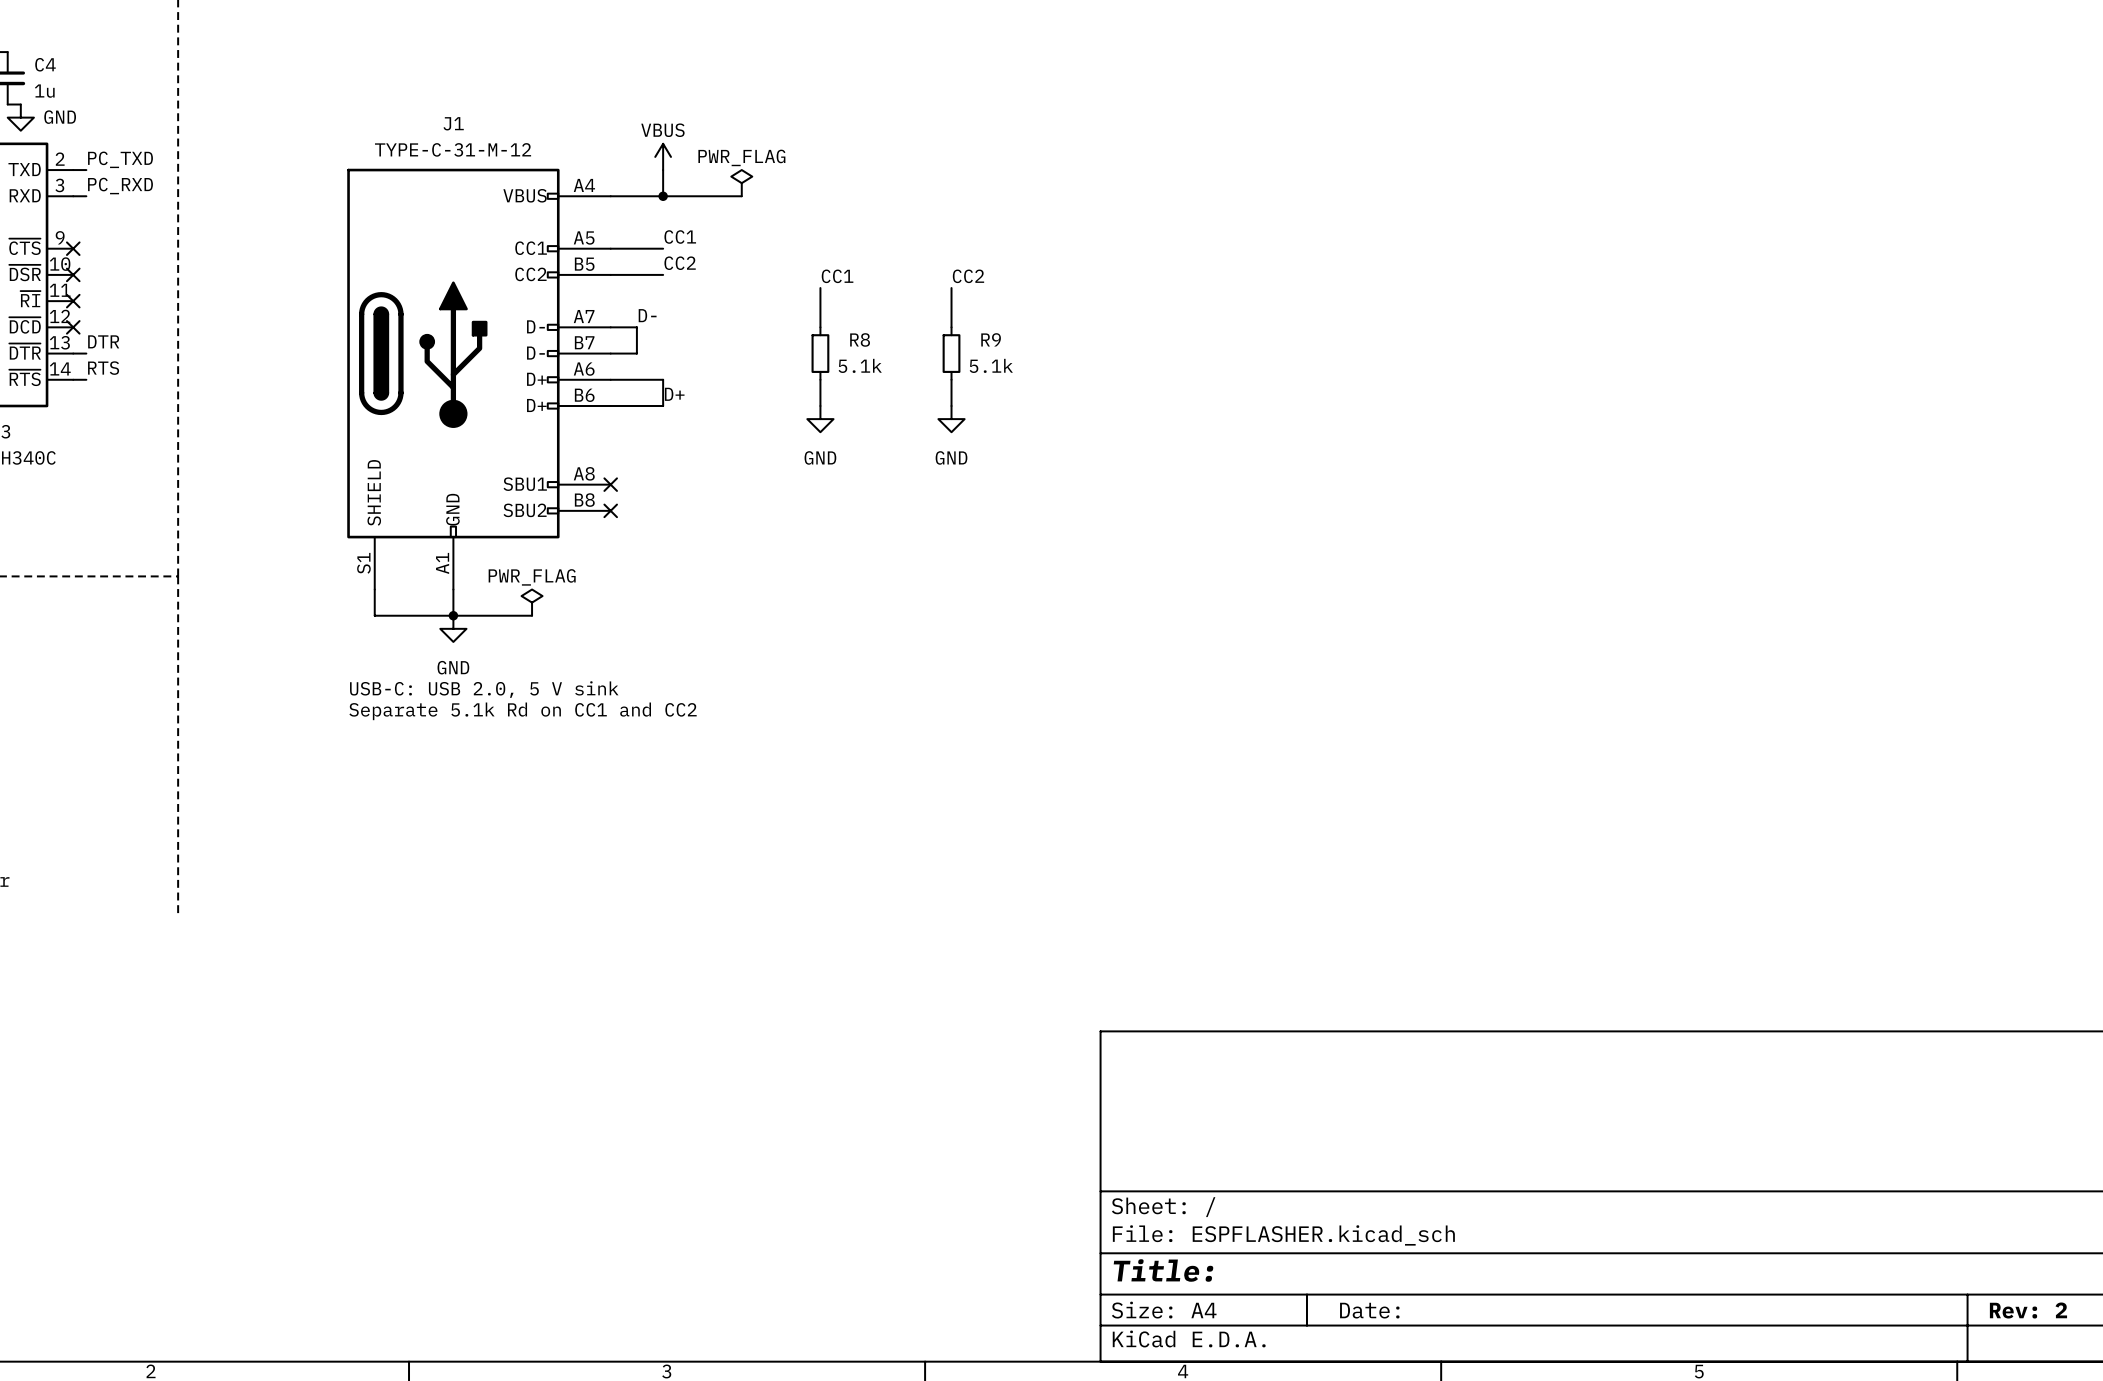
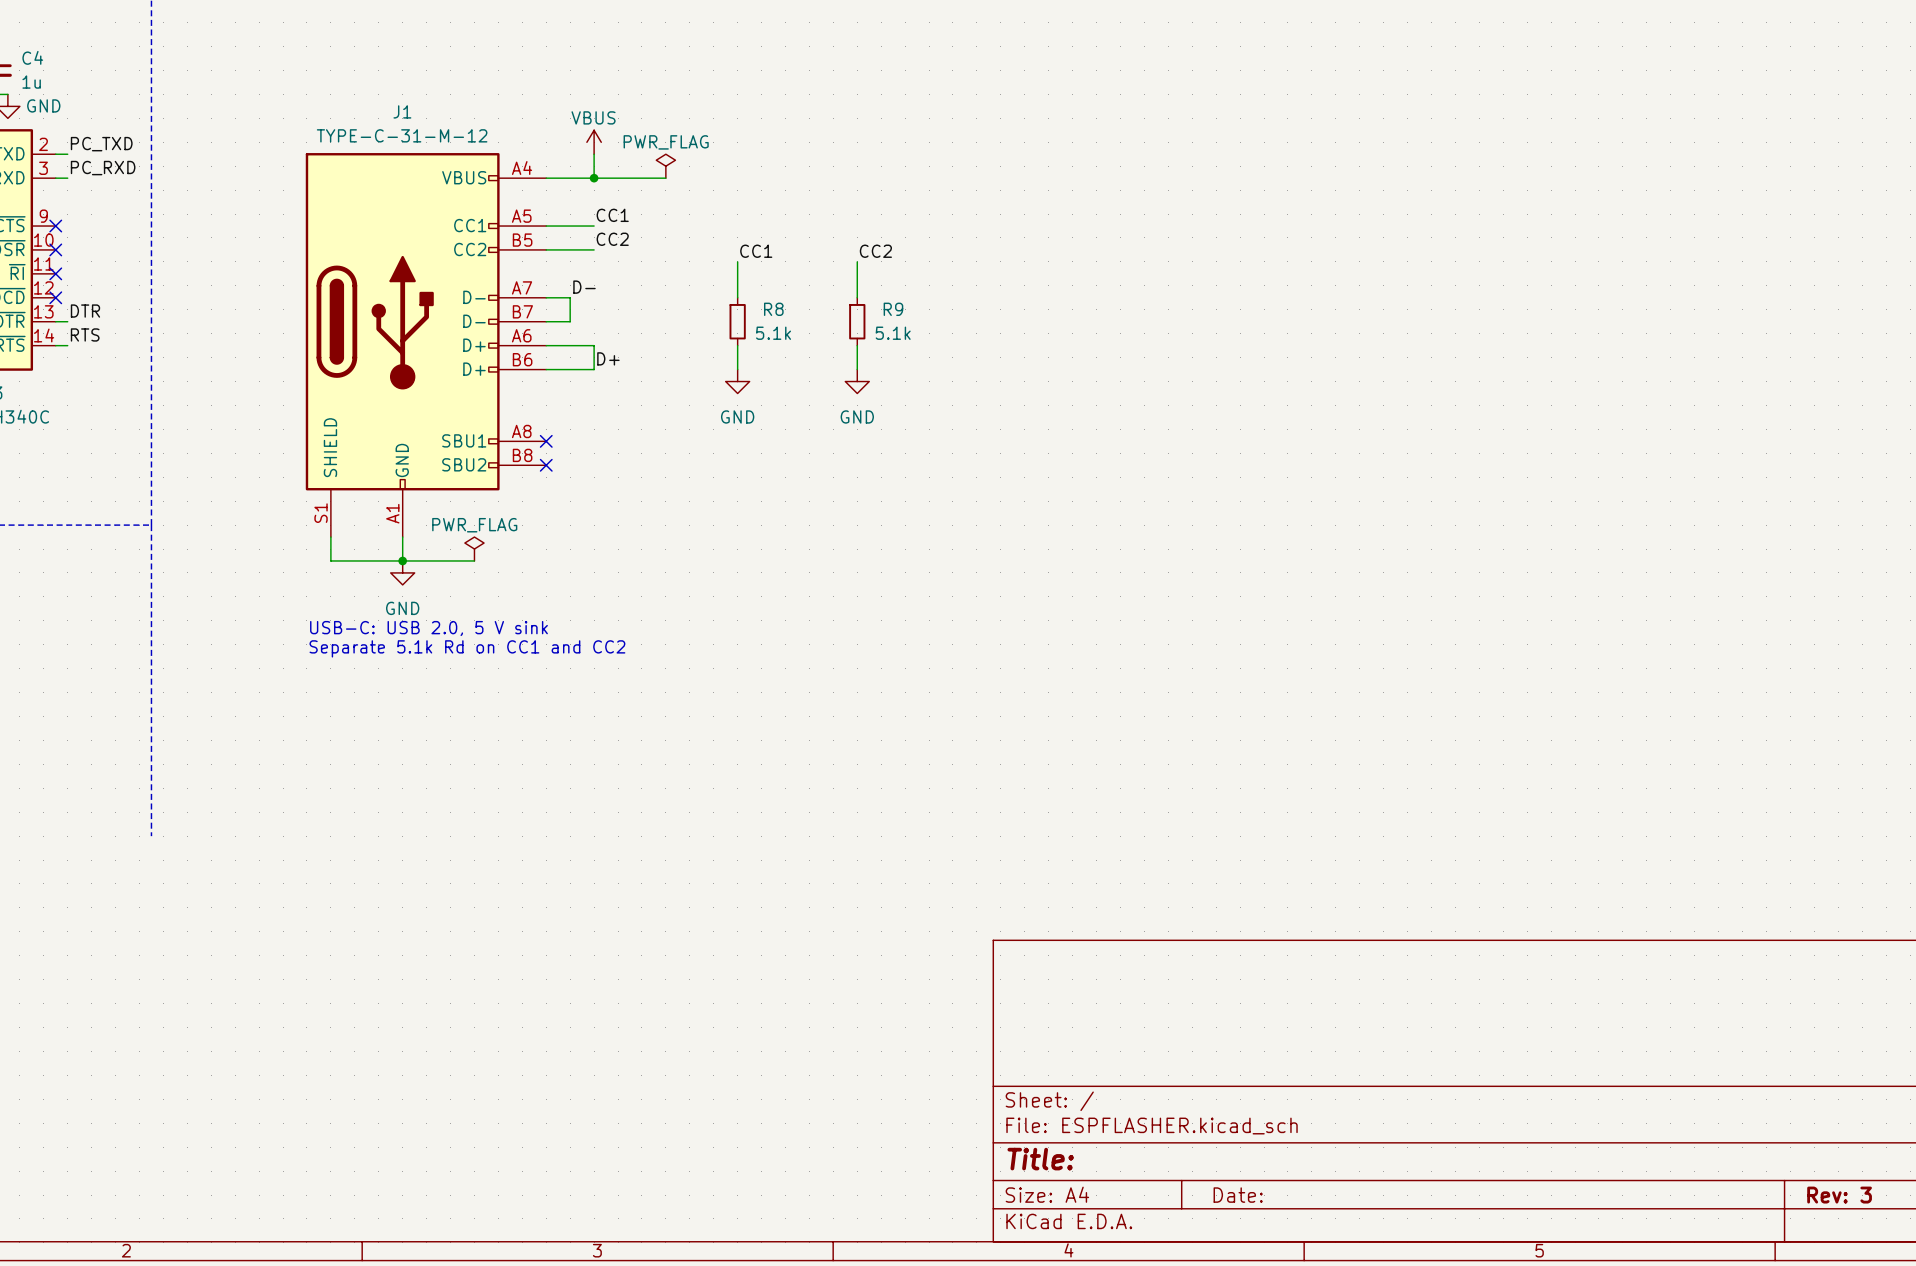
title block: Rev: 2 (2028, 1310) -> Rev: 3 (1839, 1195)

